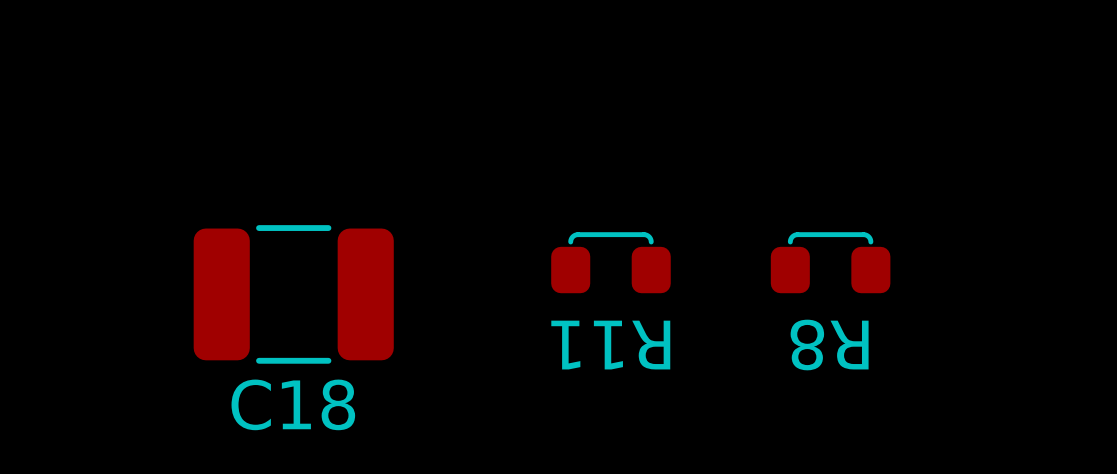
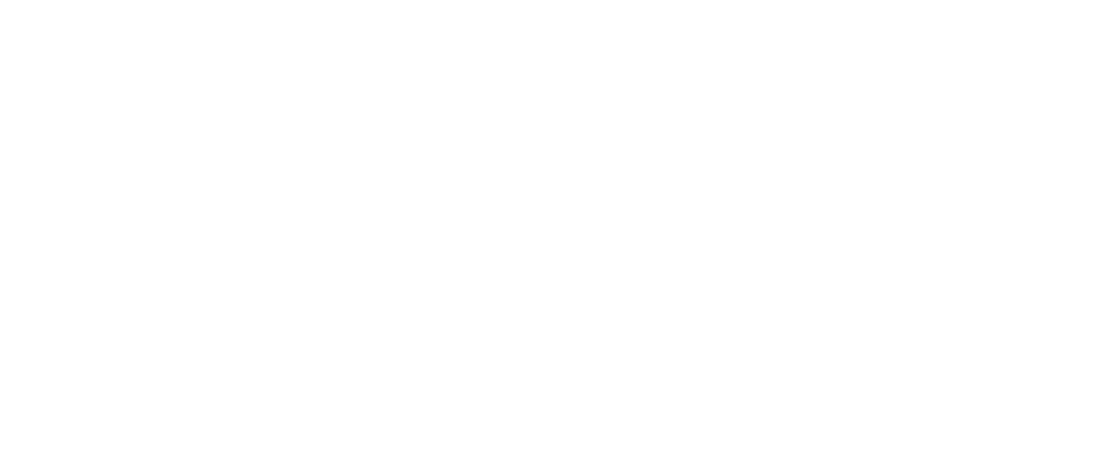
R11: (610, 262) -> none
R8: (830, 262) -> none
C18: (293, 294) -> none

